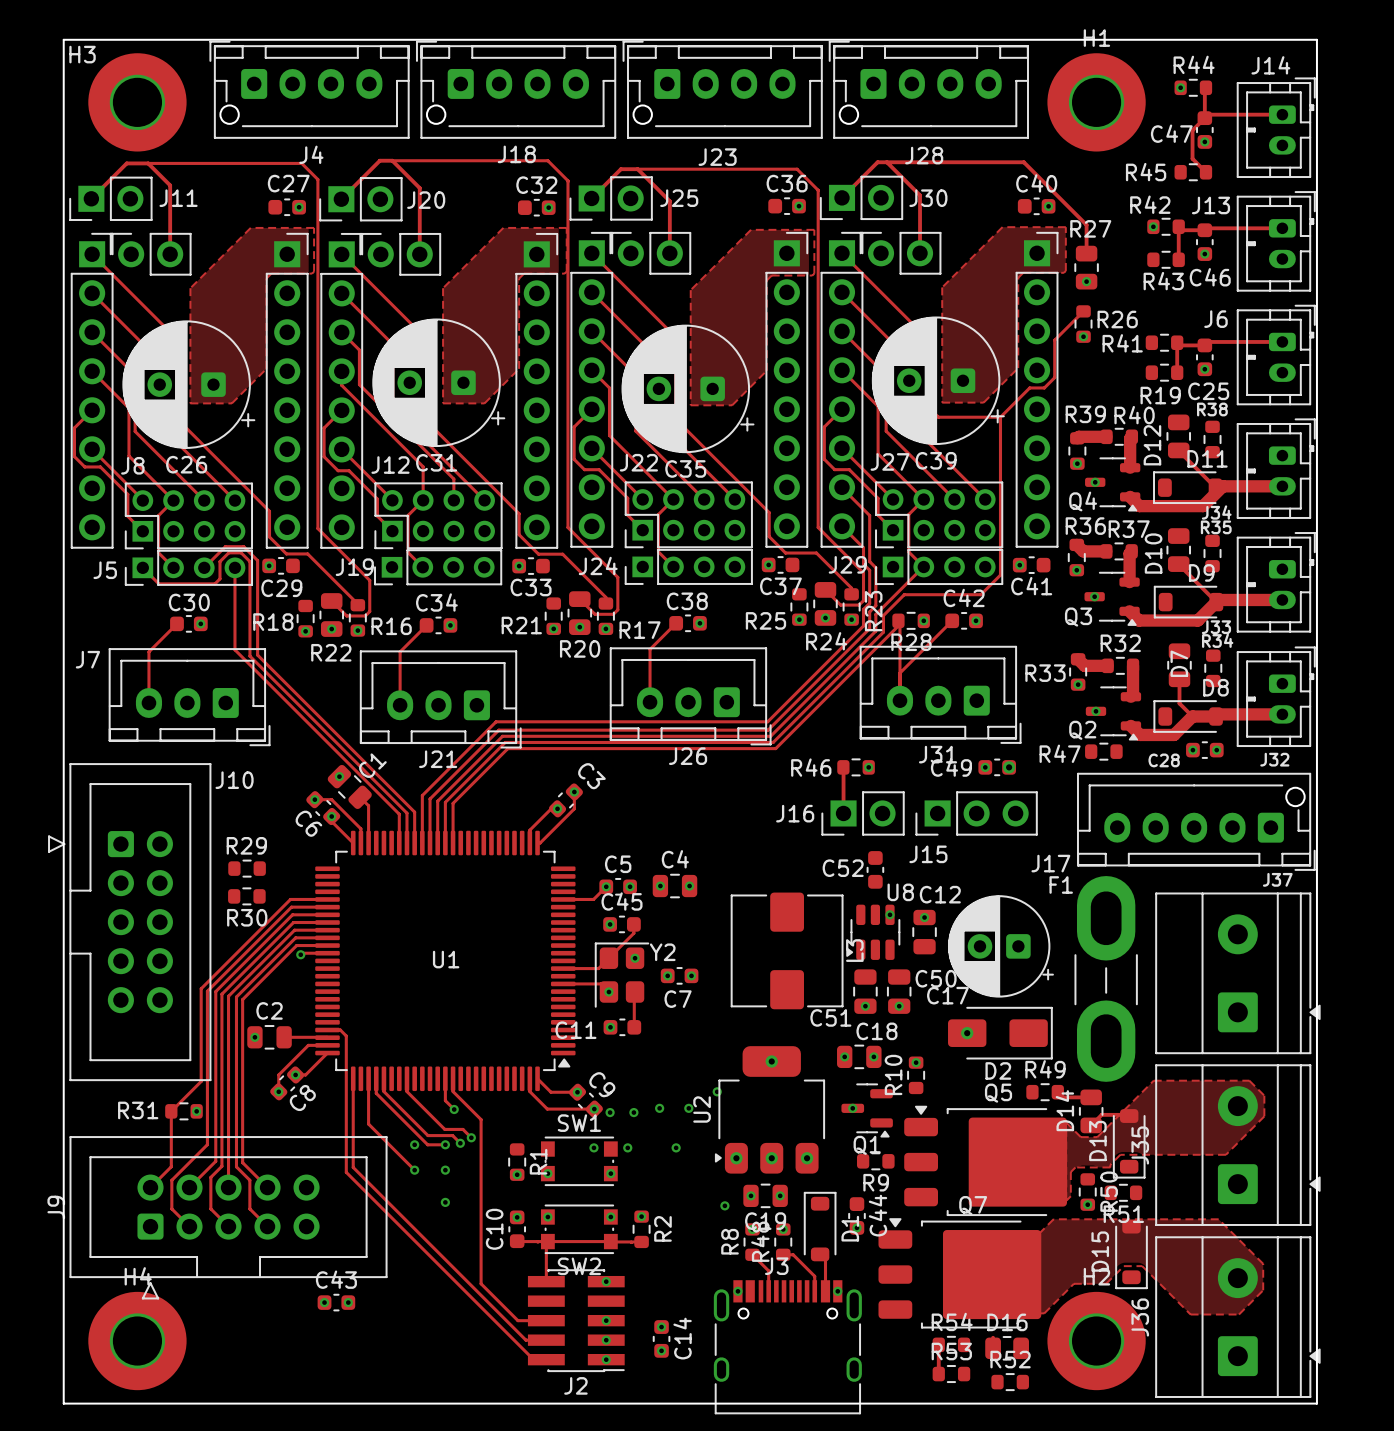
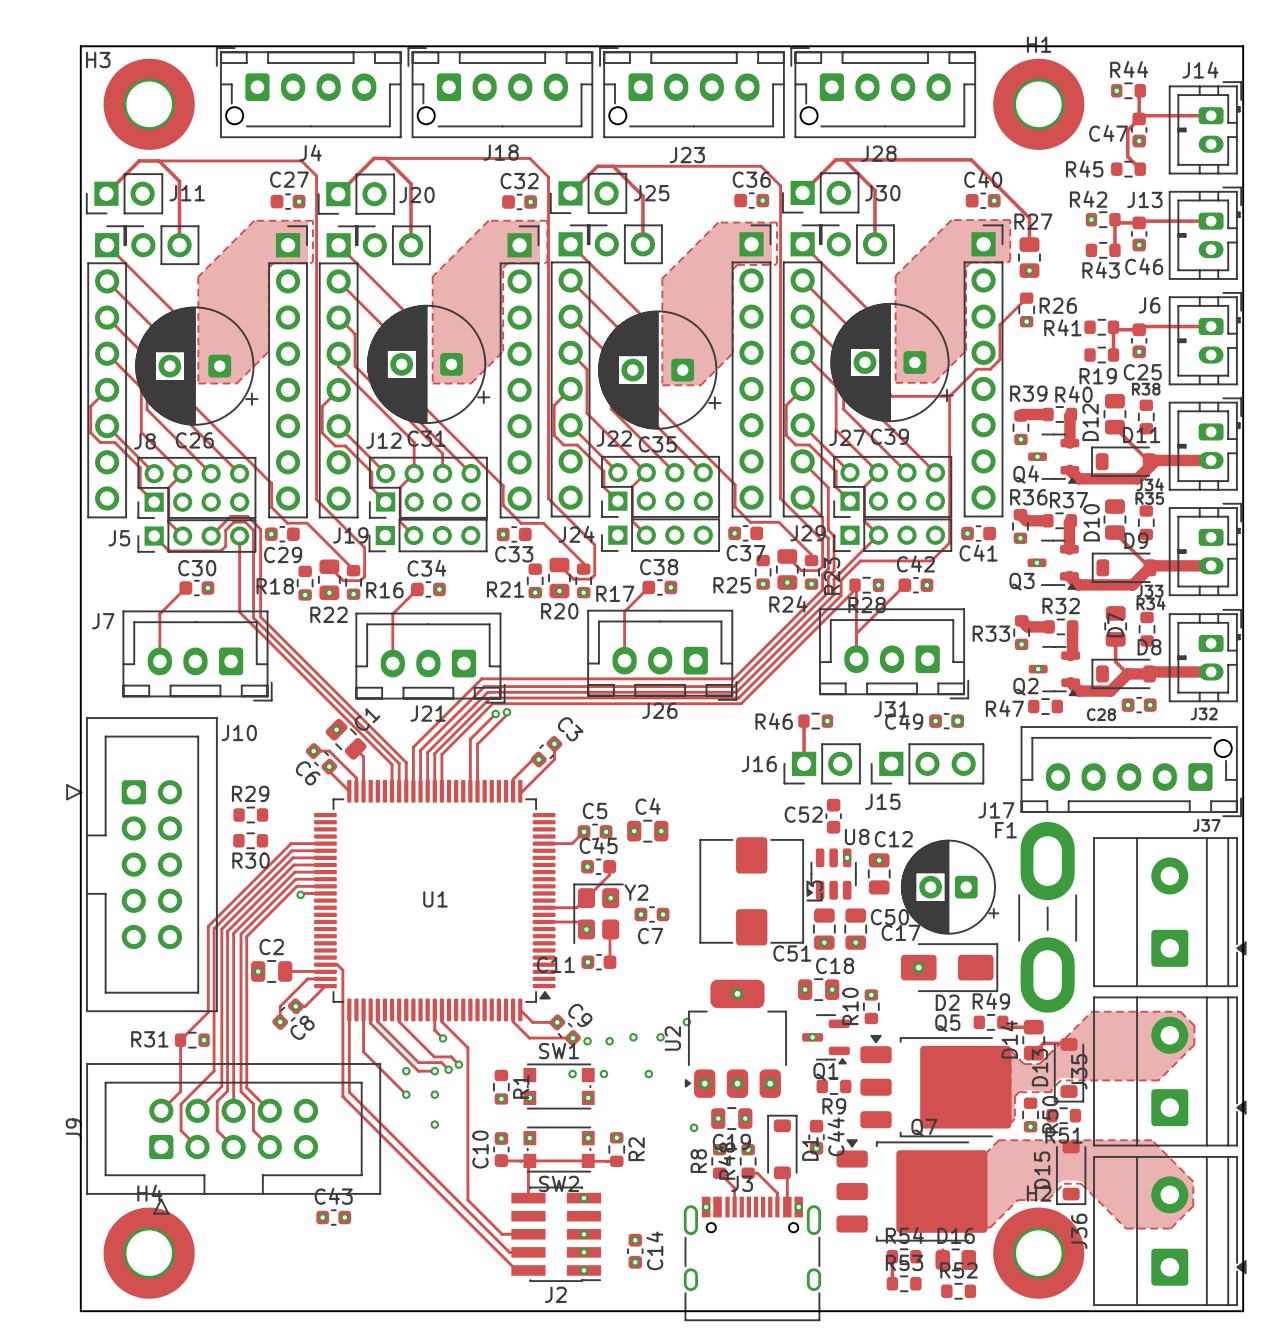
track: none -> (506, 712) (506, 714) (477, 744) (477, 791)
via: none -> (506, 712)
track: none -> (495, 714) (470, 739) (470, 791)
via: none -> (495, 714)

